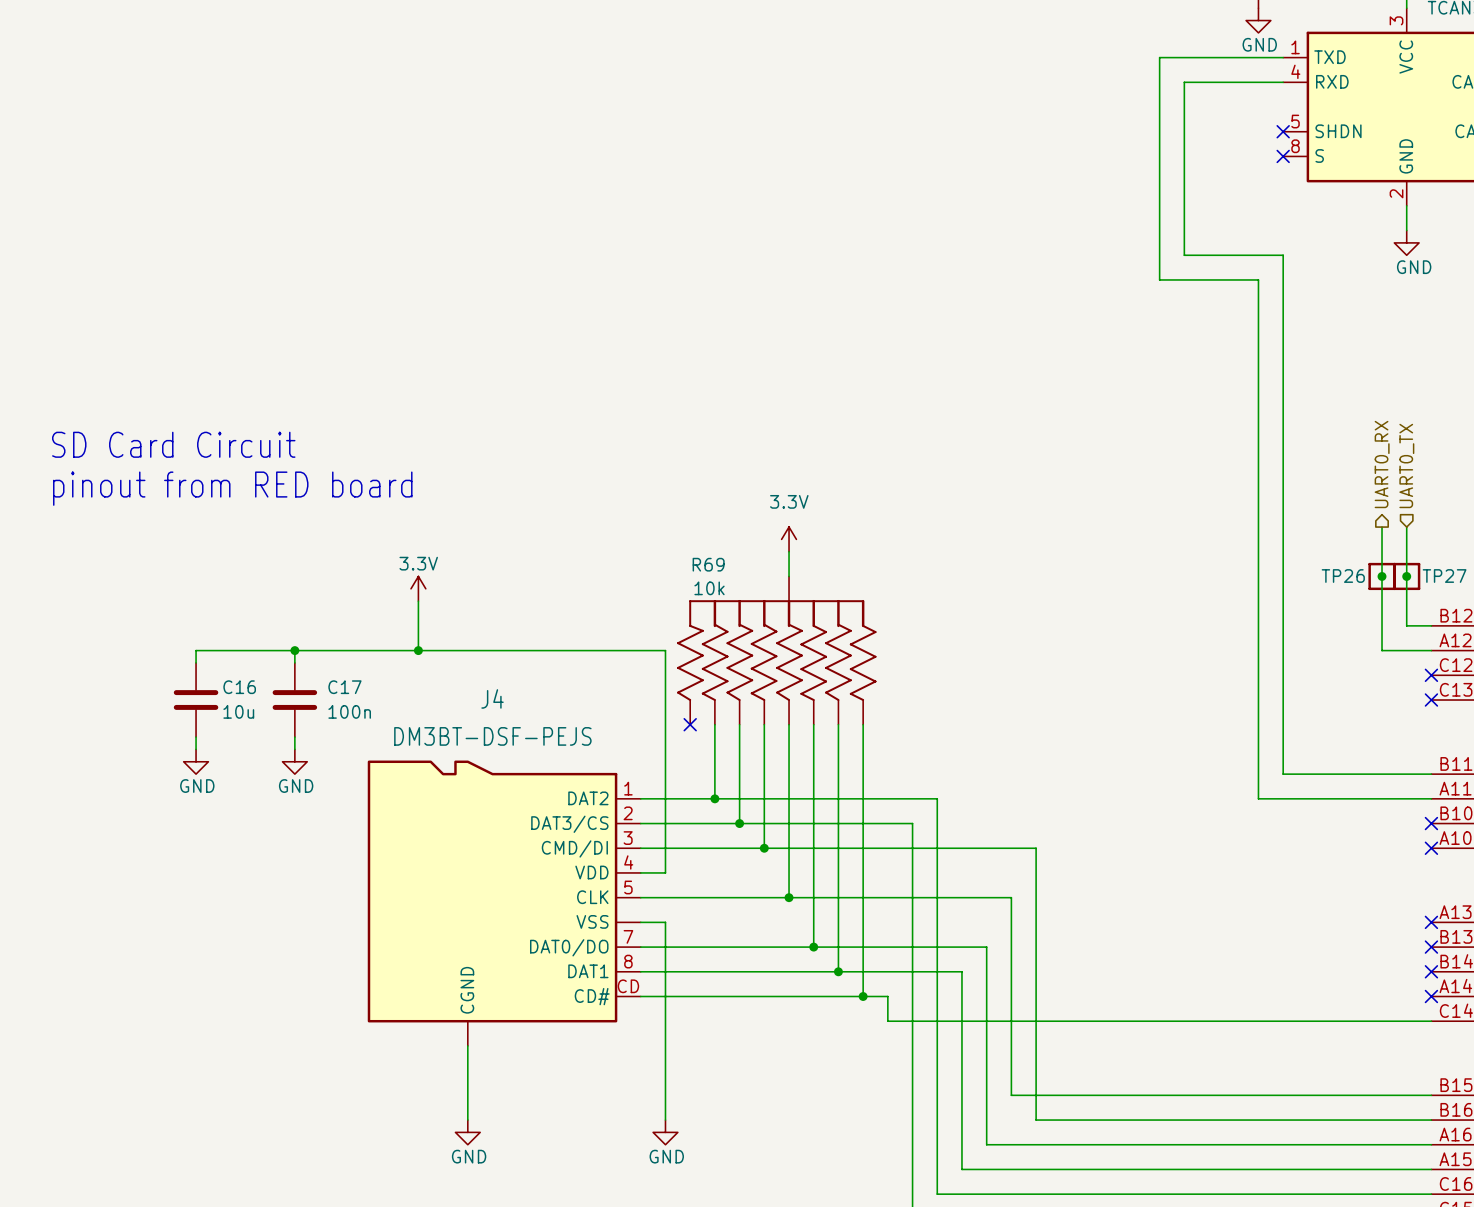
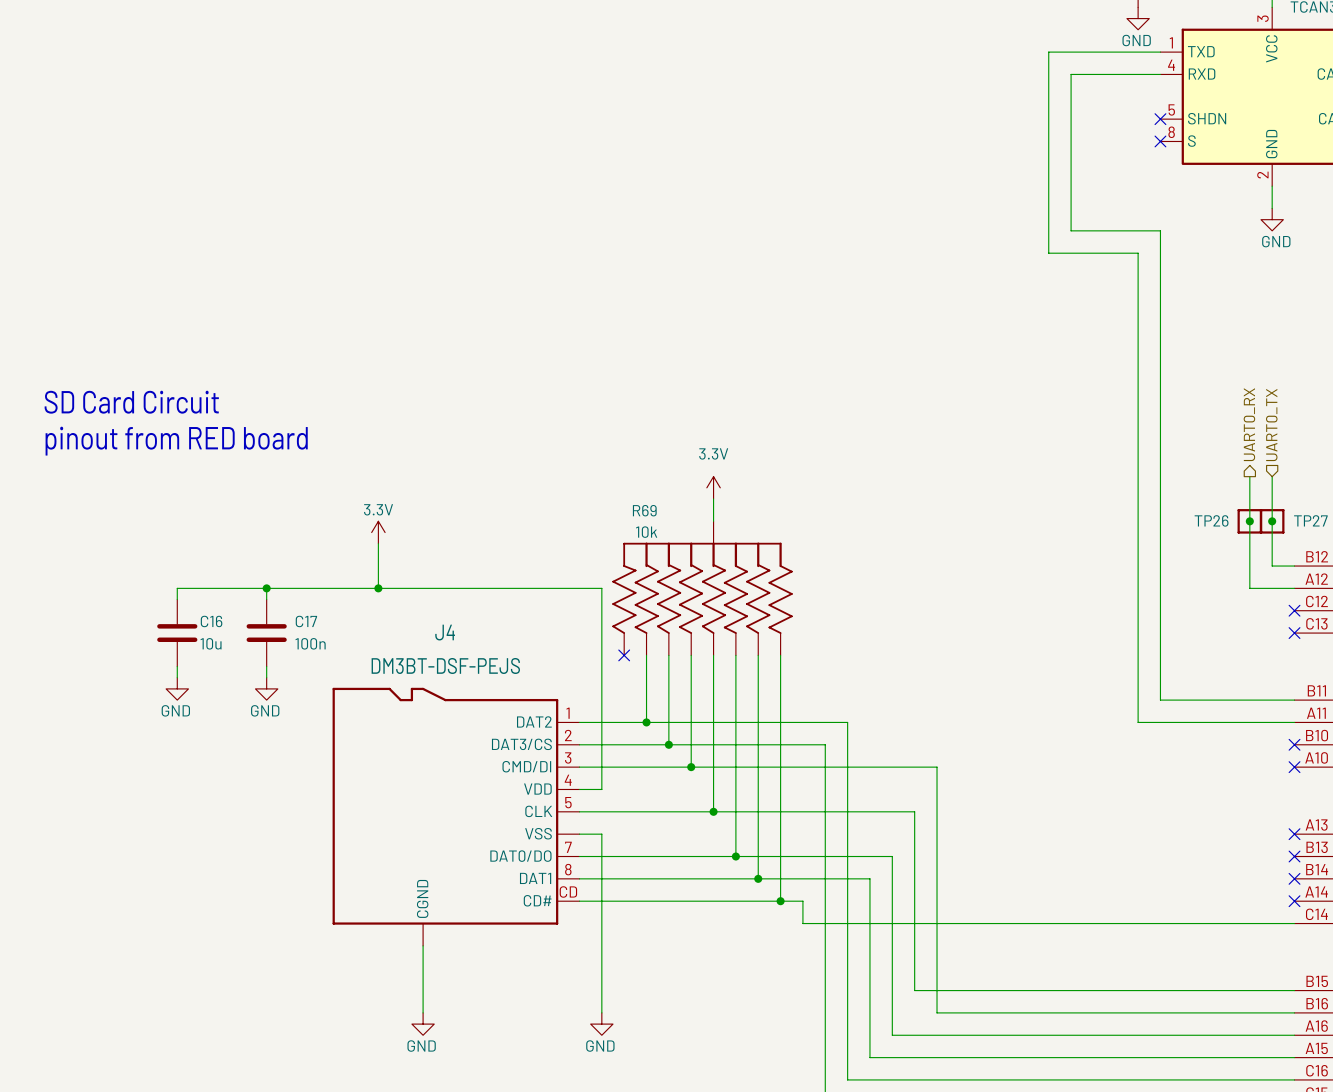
J4 symbol: [367, 760, 641, 1046] -> [332, 687, 580, 946]

